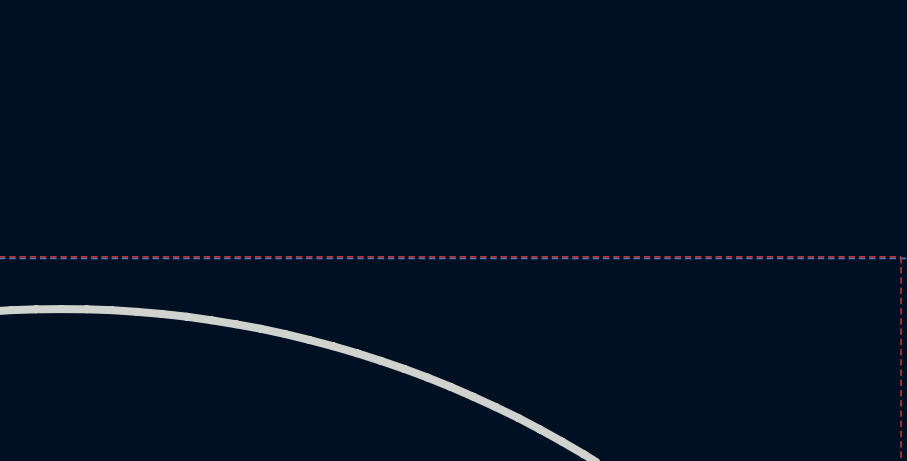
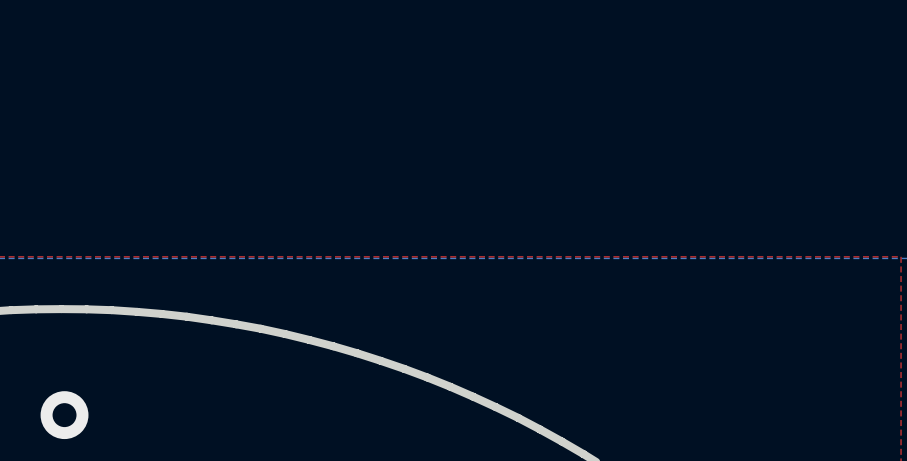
via: none -> (64, 415)

